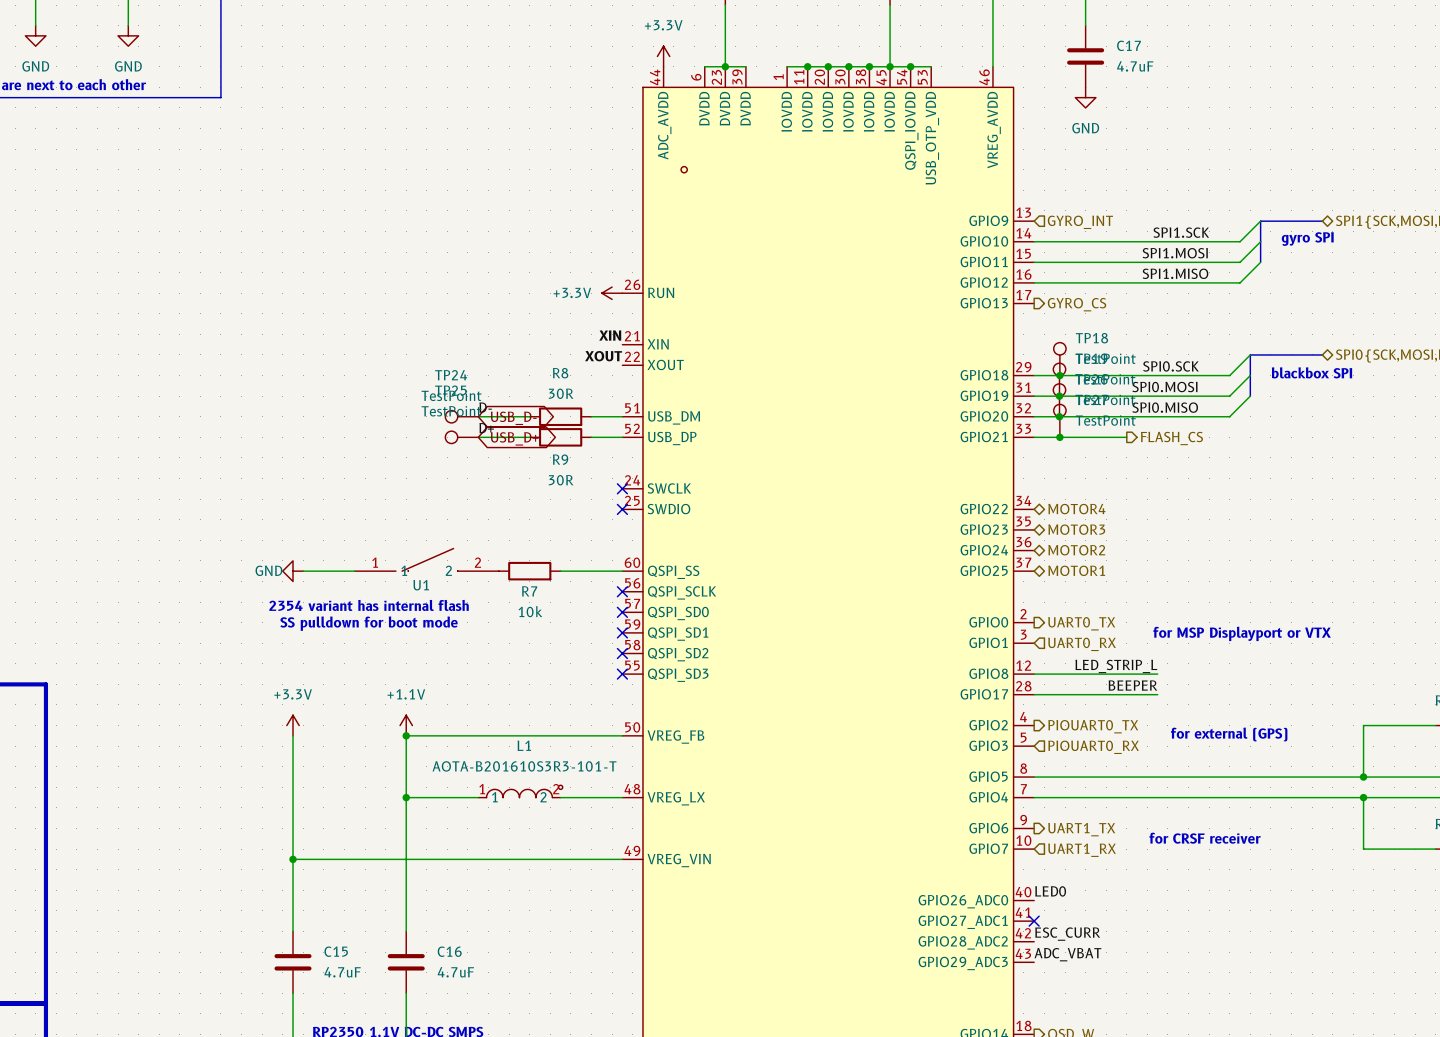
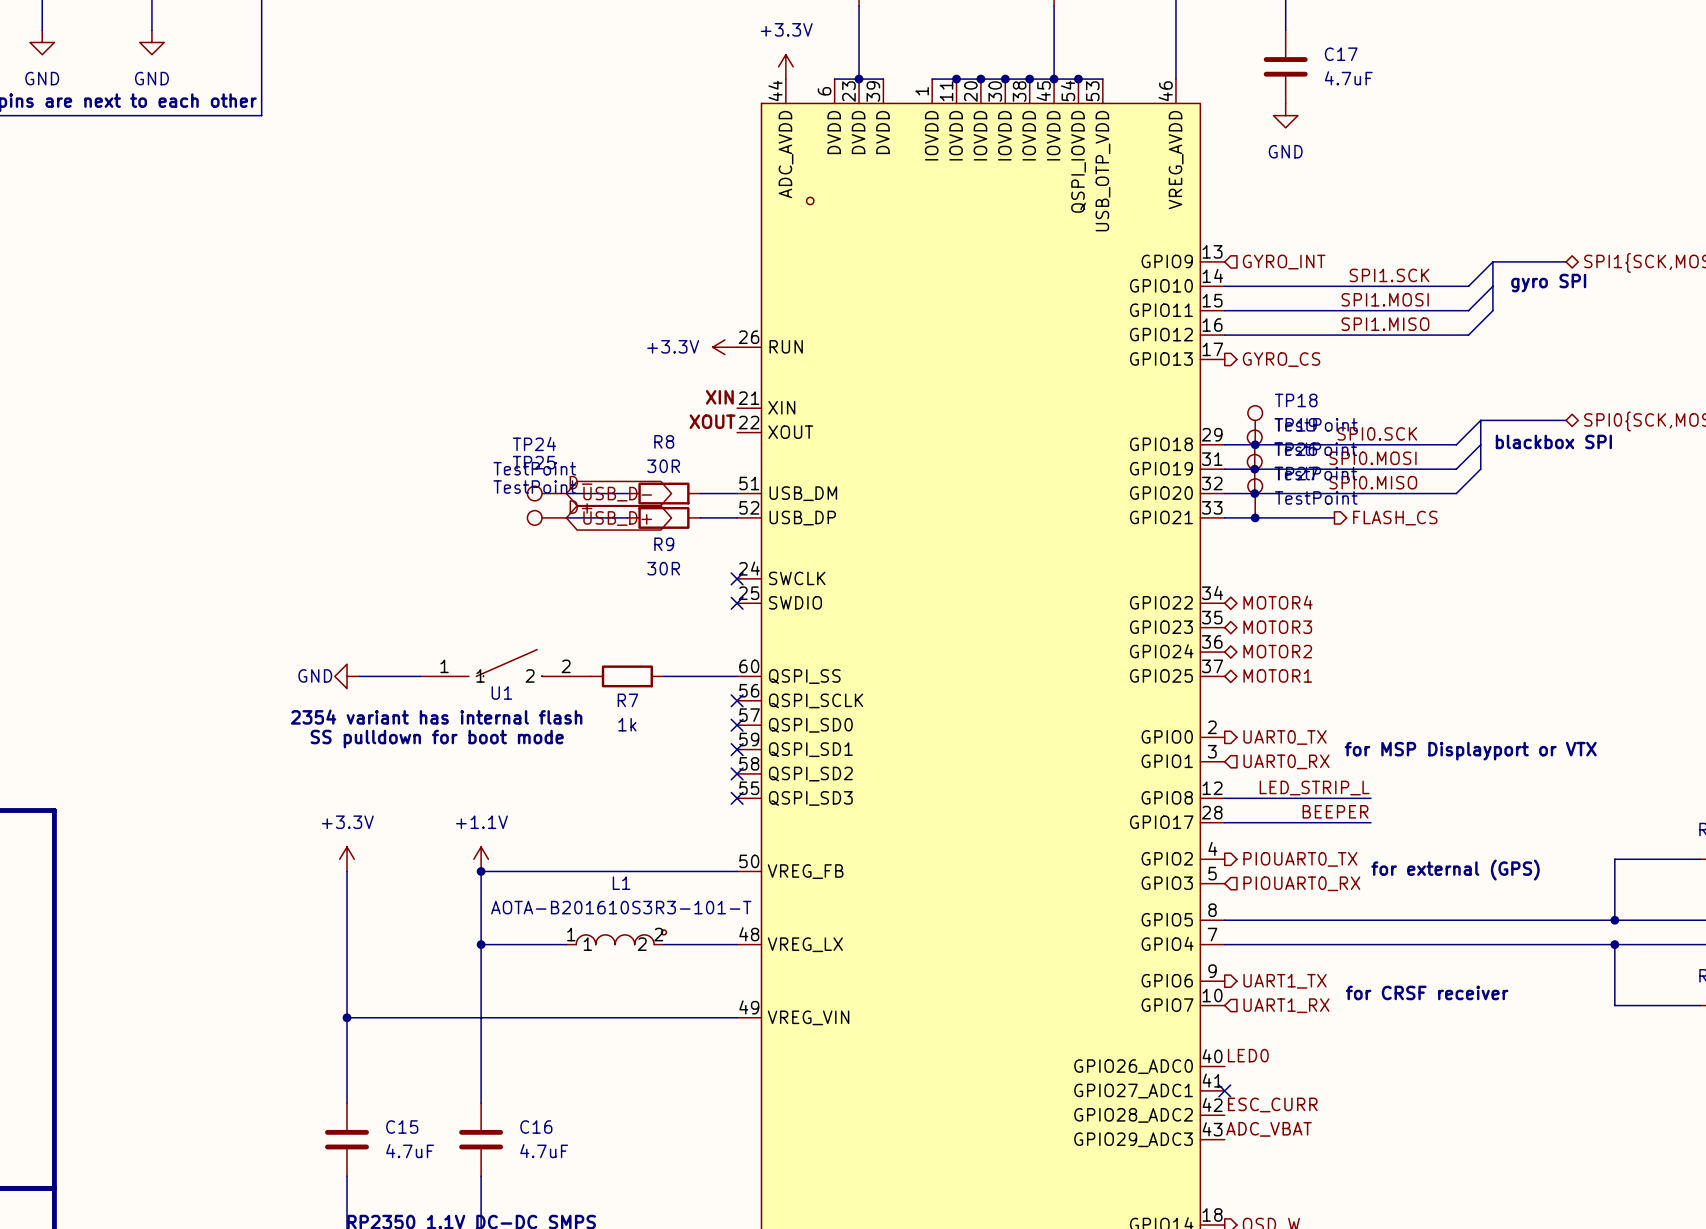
R7 value: 10k (530, 611) -> 1k (627, 724)

